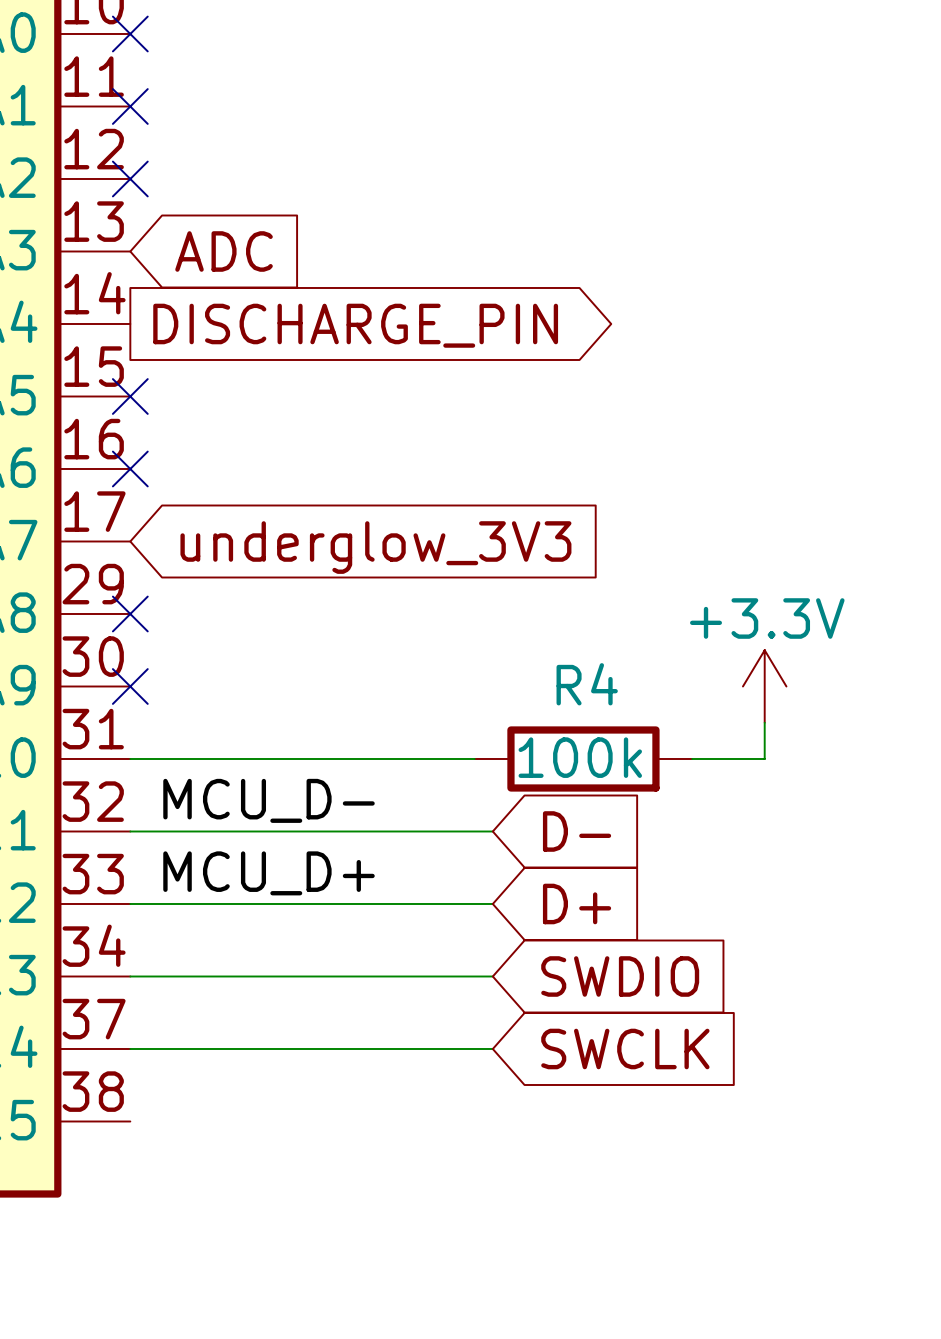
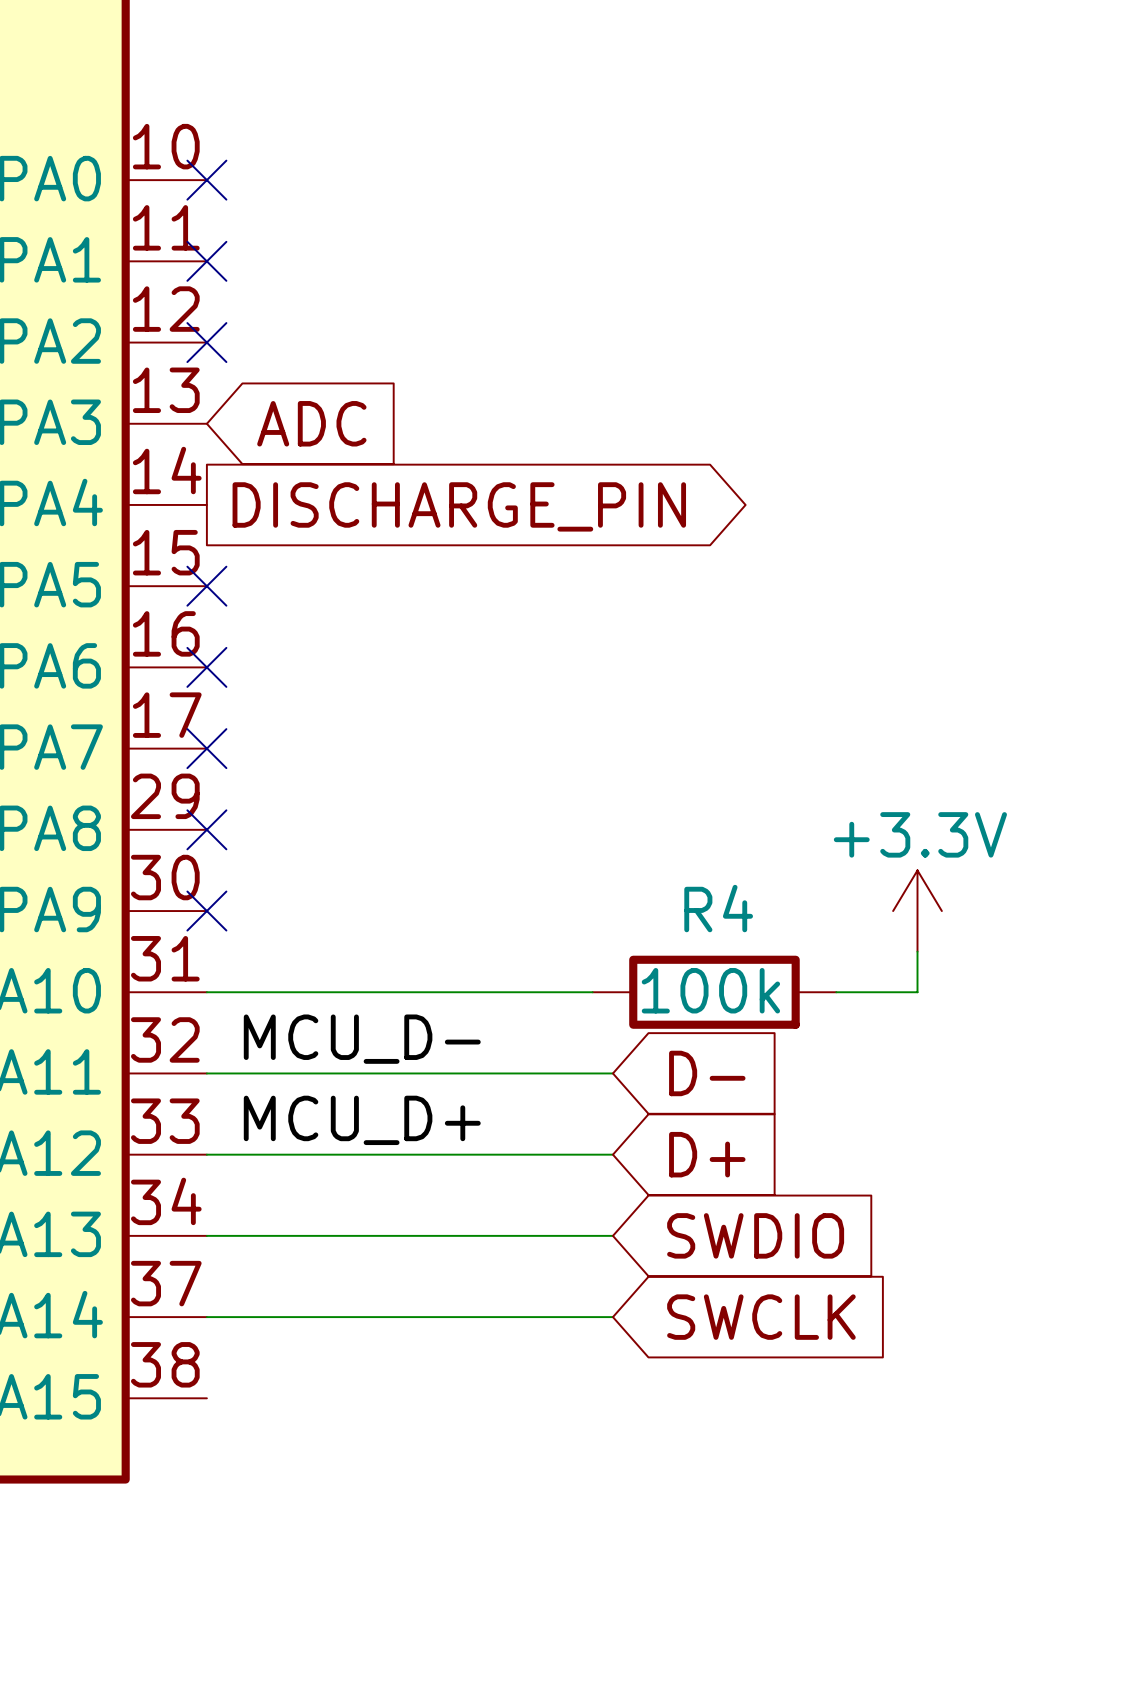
no-connect mark: none -> (206, 748)
global label: underglow_3V3 (375, 547) -> none

